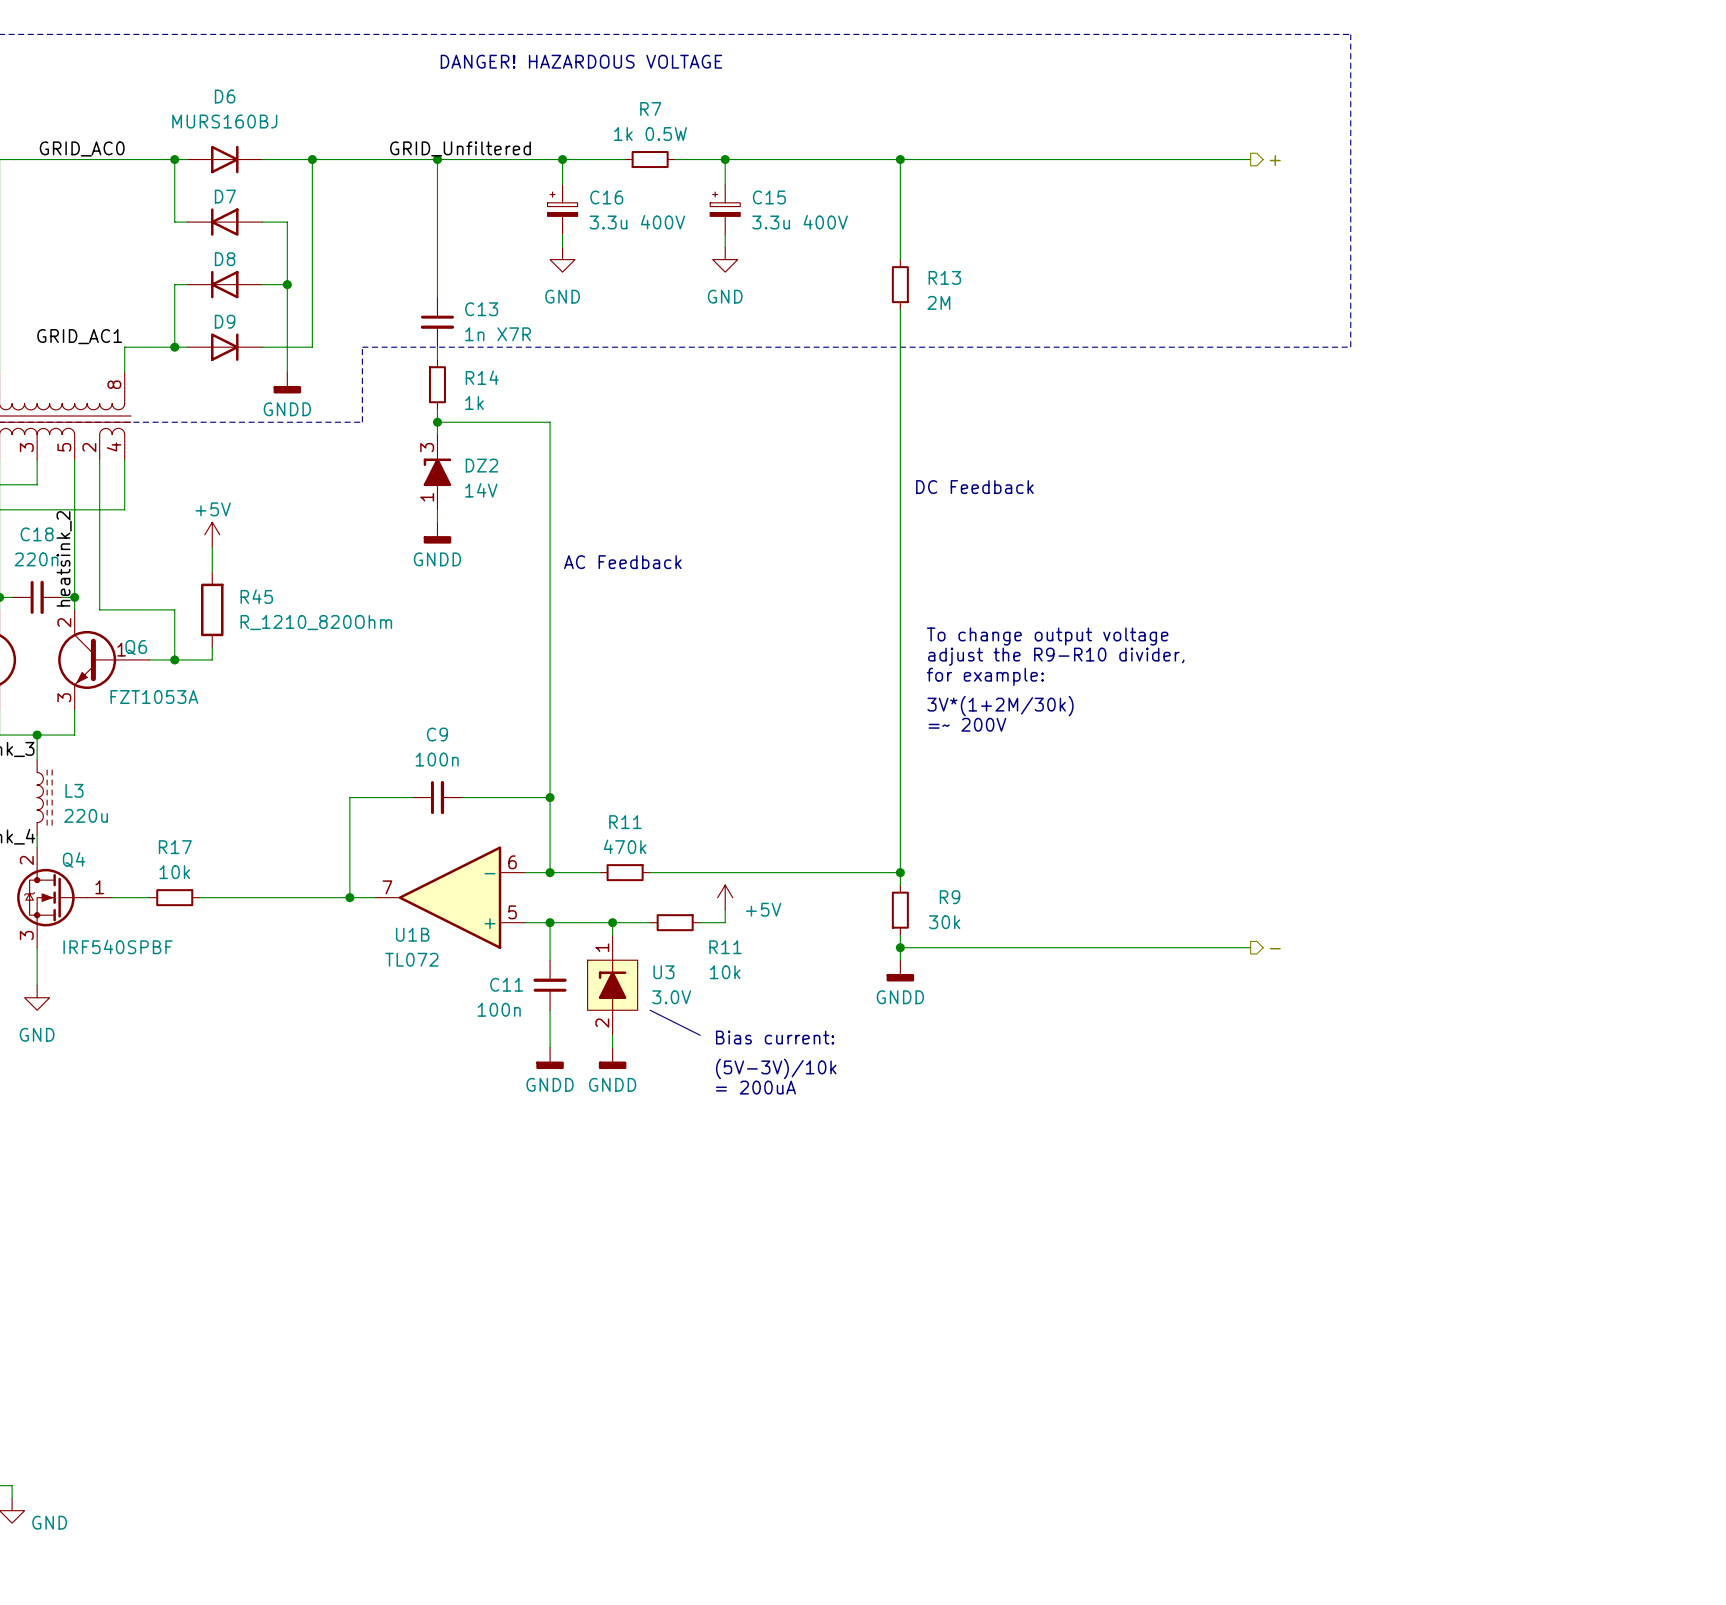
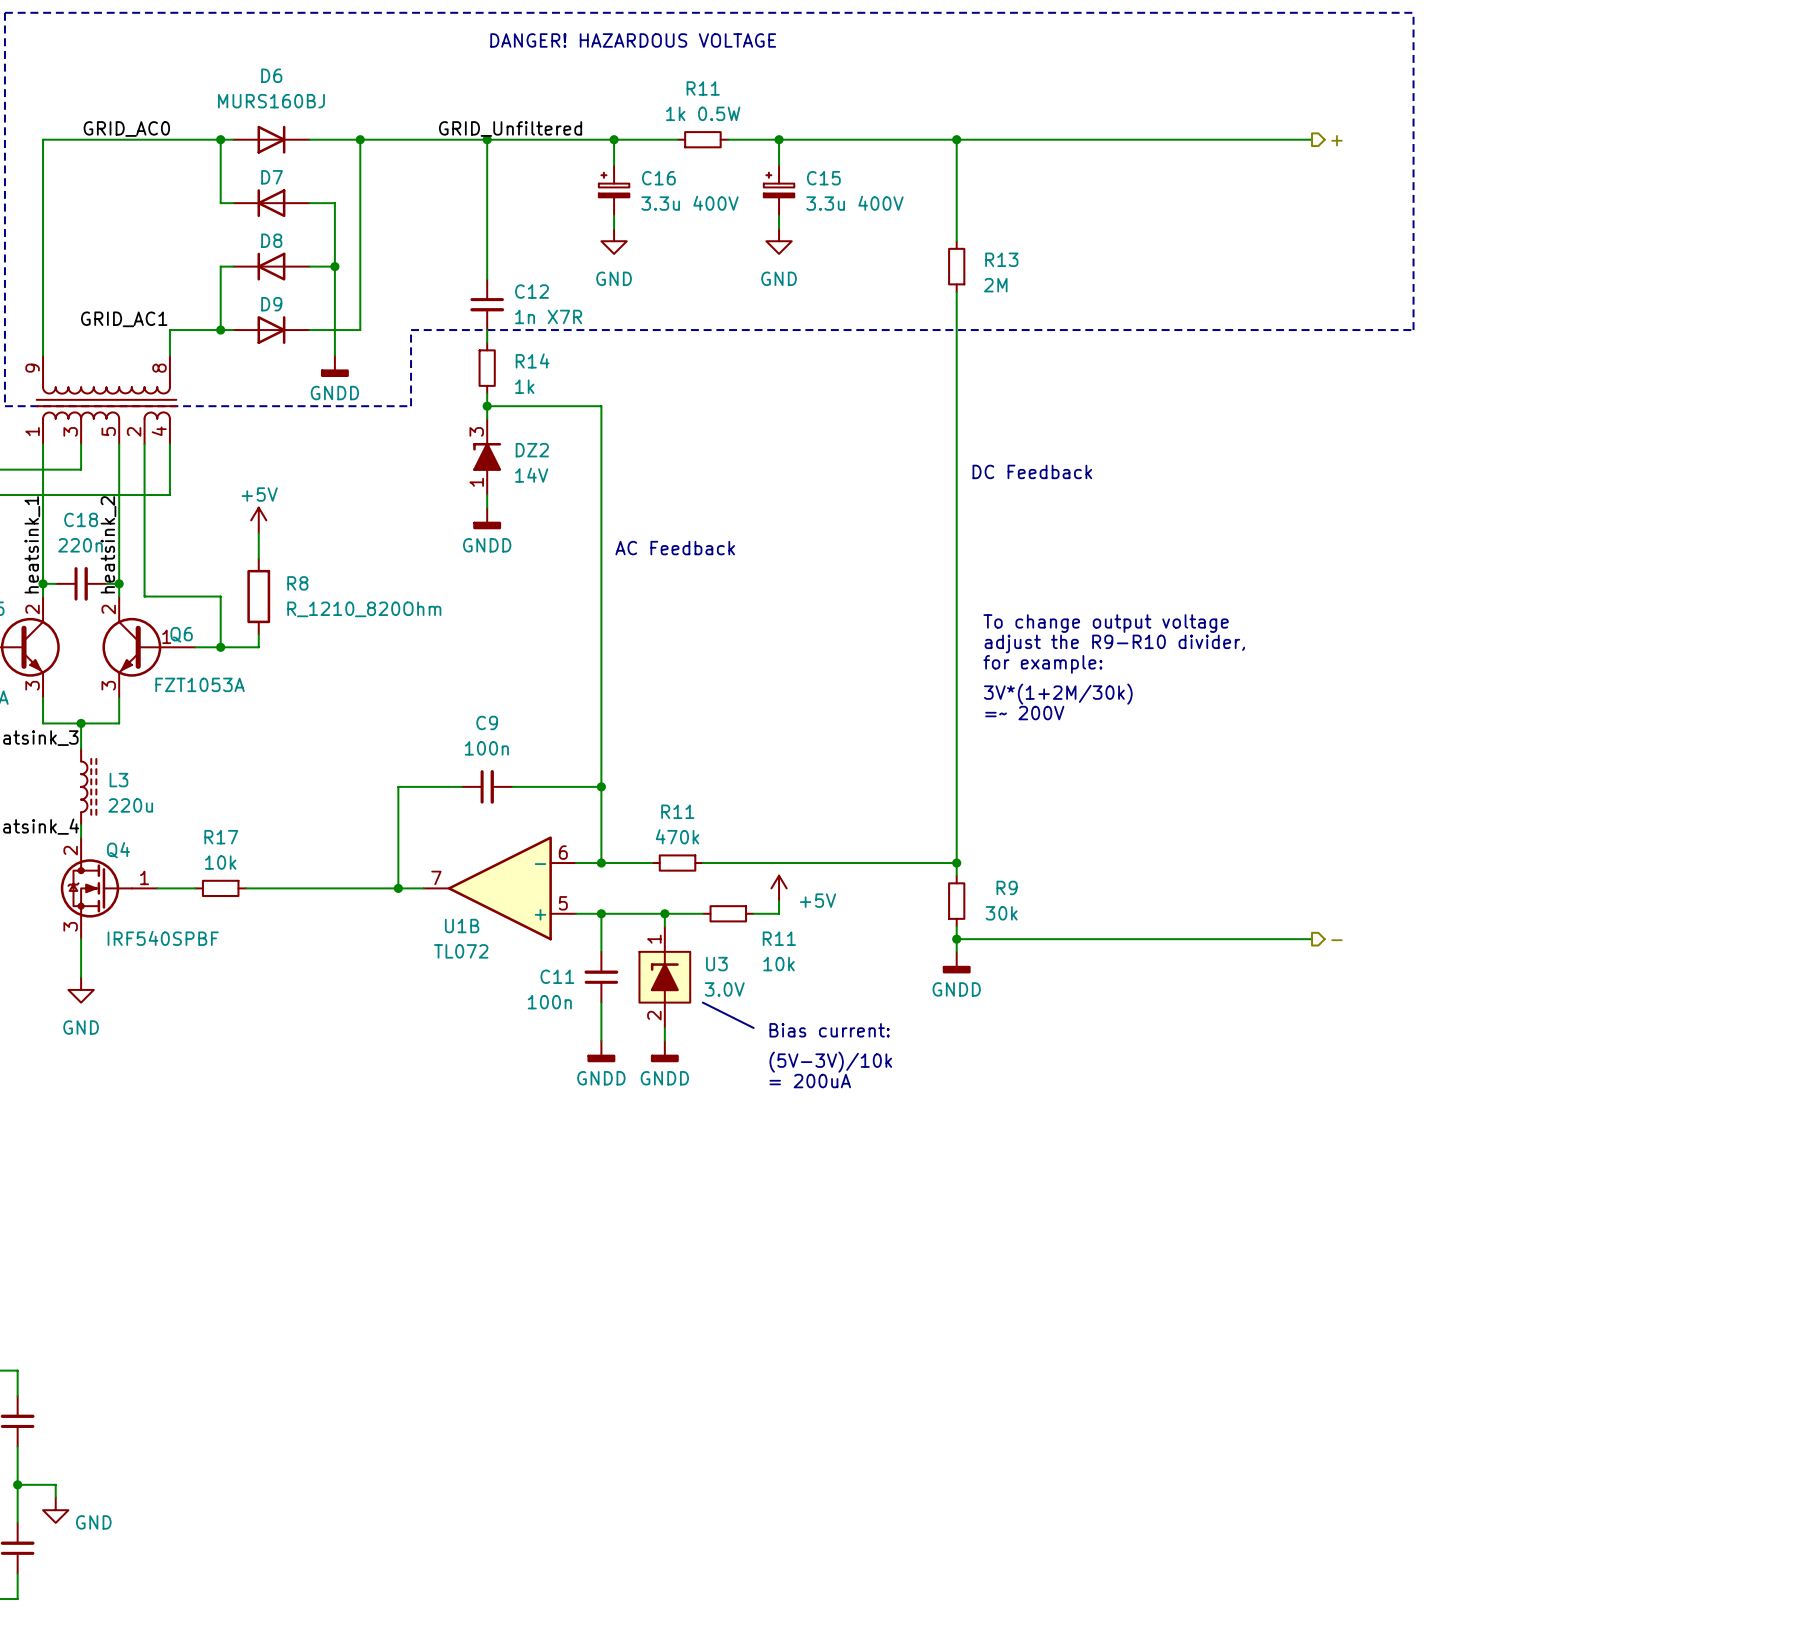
R7 name: R7 (650, 109) -> R11 (703, 88)
C13 name: C13 (481, 309) -> C12 (531, 291)
R45 name: R45 (256, 596) -> R8 (297, 583)

